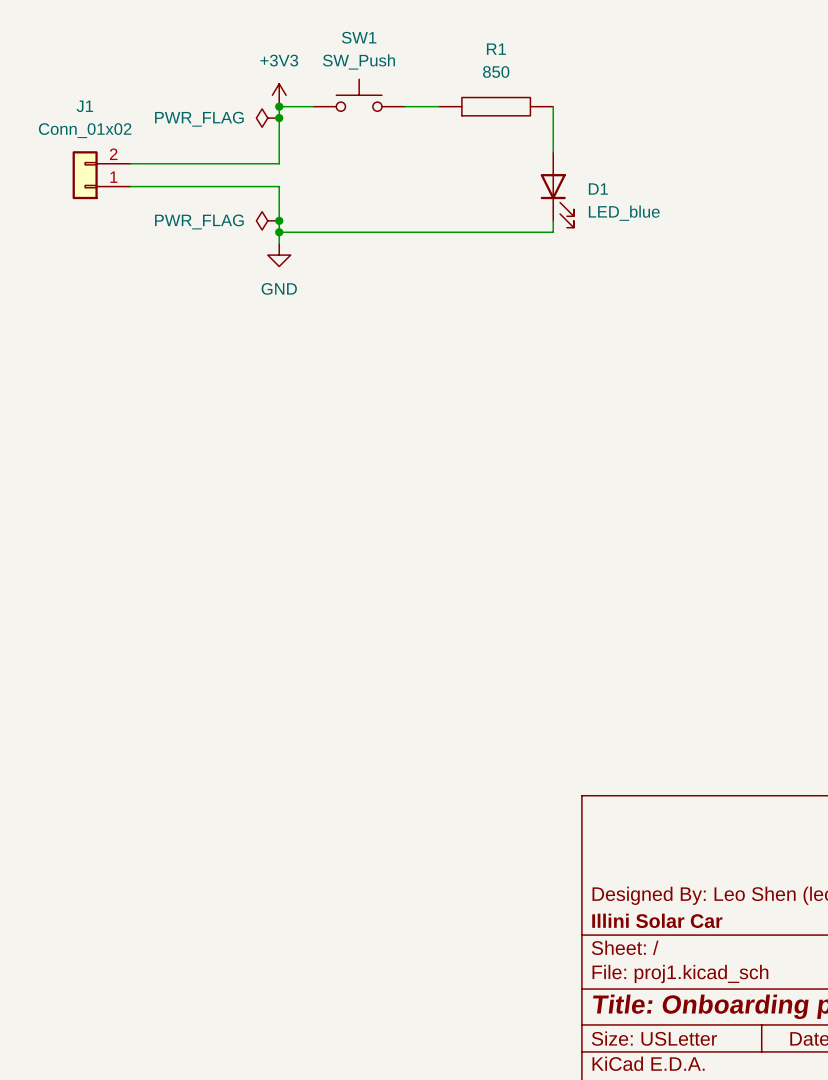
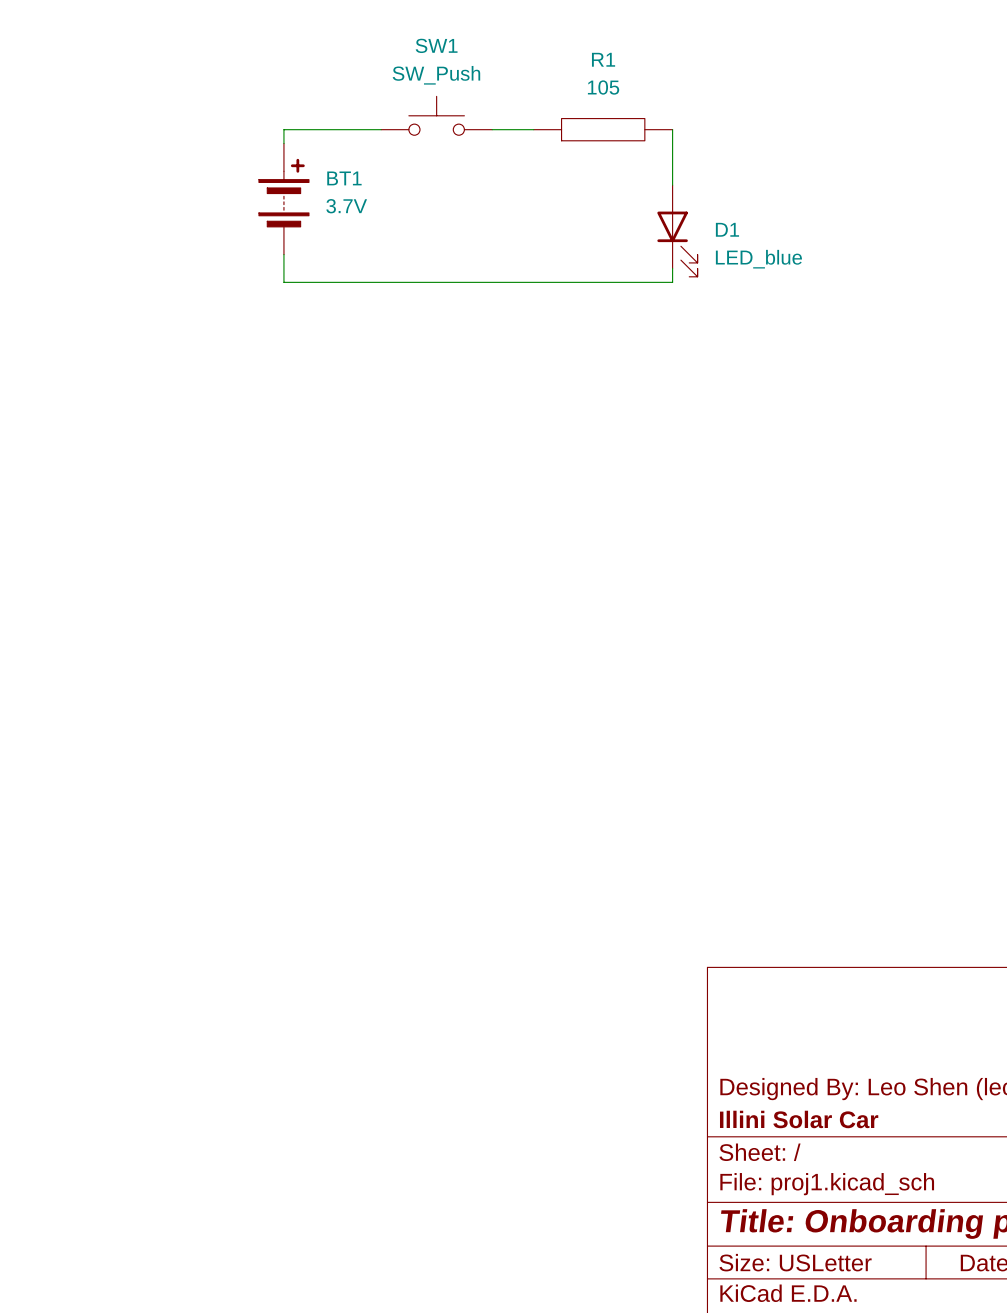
R1 value: 850 (496, 71) -> 105 (603, 87)
power symbol: +3V3 (279, 95) -> none
wire: (279, 106) (279, 163) (130, 163) -> (339, 129) (283, 129) (283, 143)
junction: (279, 106) -> none
power symbol: PWR_FLAG (267, 118) -> none
junction: (279, 118) -> none
BT1: none -> 3.7V (283, 199)
J1: Conn_01x02 (101, 175) -> none
wire: (130, 186) (279, 186) (279, 243) -> none
wire: none -> (283, 254) (283, 282) (339, 282)
power symbol: PWR_FLAG (267, 220) -> none
junction: (279, 220) -> none
junction: (279, 232) -> none
power symbol: GND (279, 255) -> none

